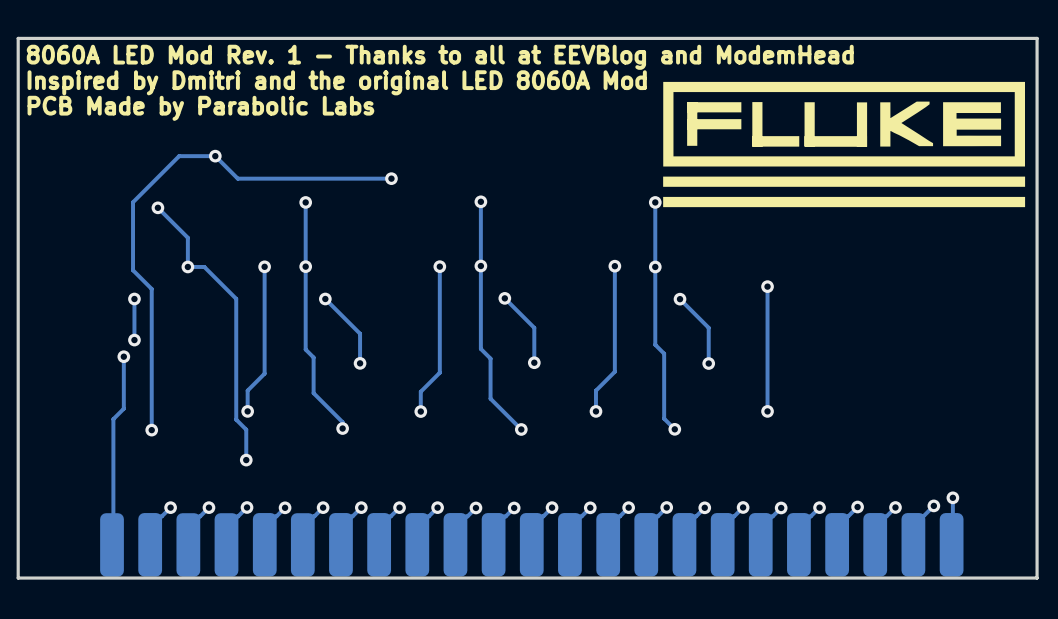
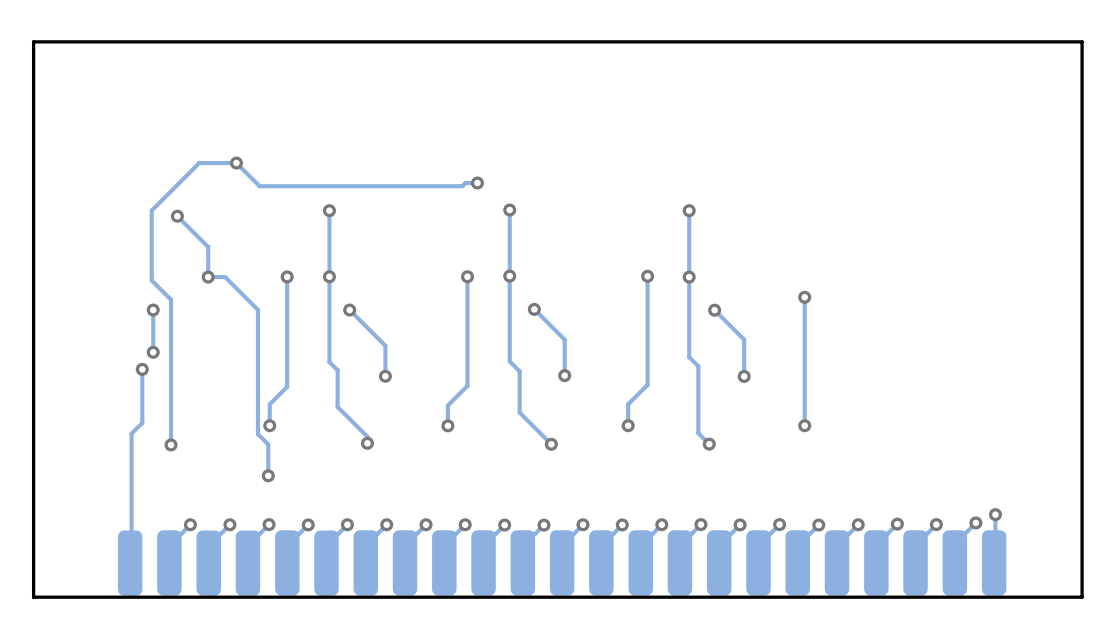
text: 8060A LED Mod Rev. 1 - Thanks to all at EEVBlog and ModemHead (440, 57) -> none
drawing: [663, 81, 1026, 208] -> none
text: Inspired by Dmitri and the original LED 8060A Mod (337, 82) -> none
text: PCB Made by Parabolic Labs (200, 108) -> none
track: none -> (477, 183) (465, 183) (462, 186) (417, 186)
via position: (391, 178) -> (477, 183)

